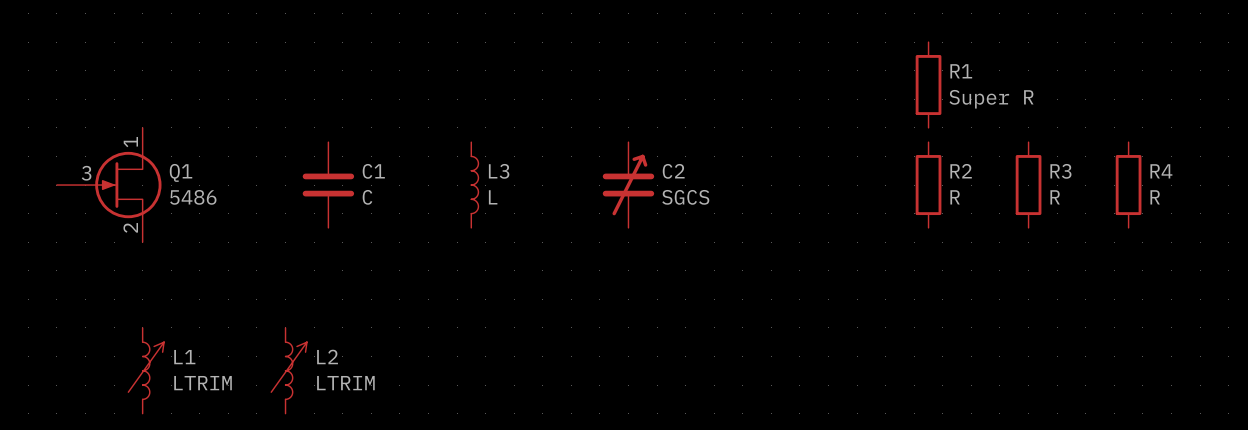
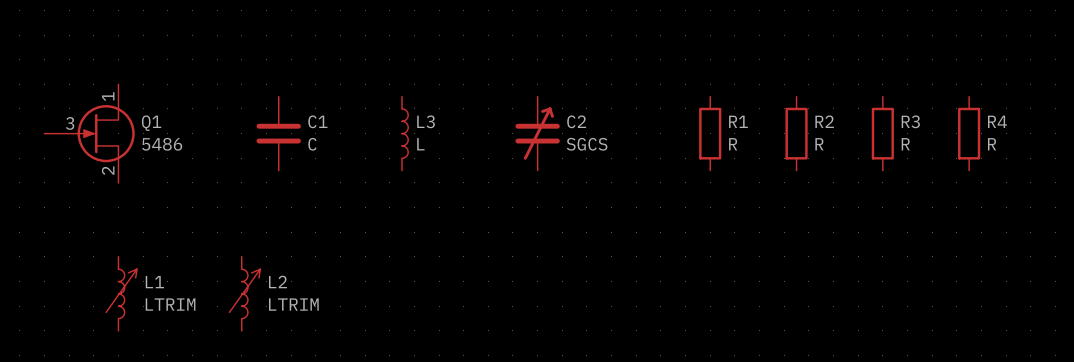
R1 position: (928, 85) -> (710, 133)
R1 value: Super R (991, 99) -> R (733, 144)

